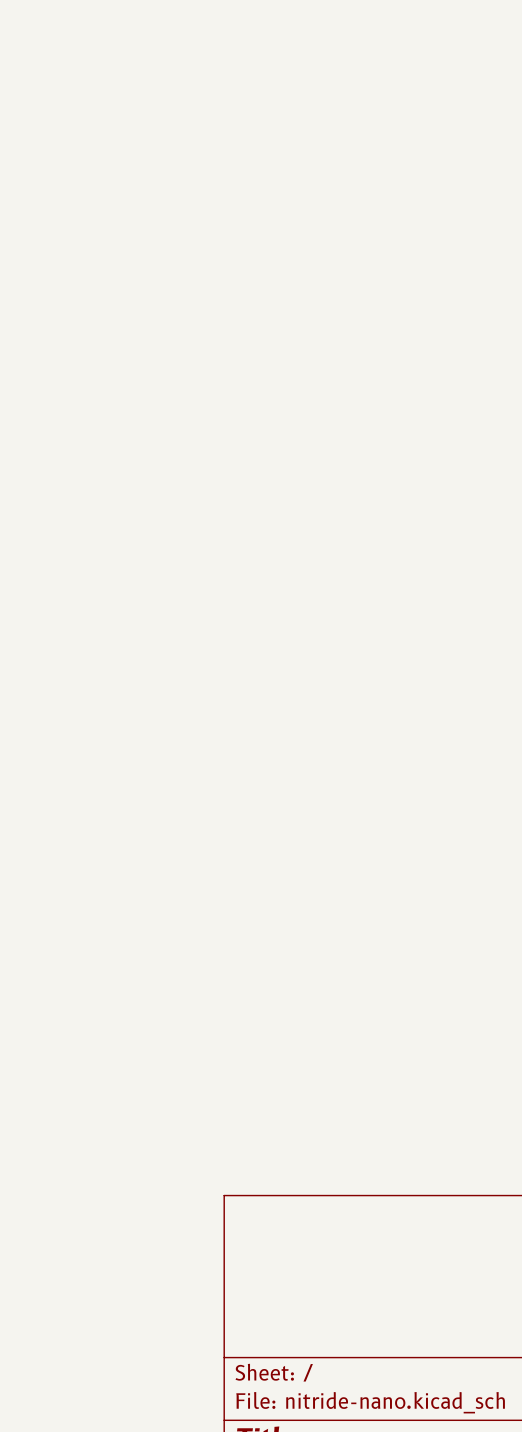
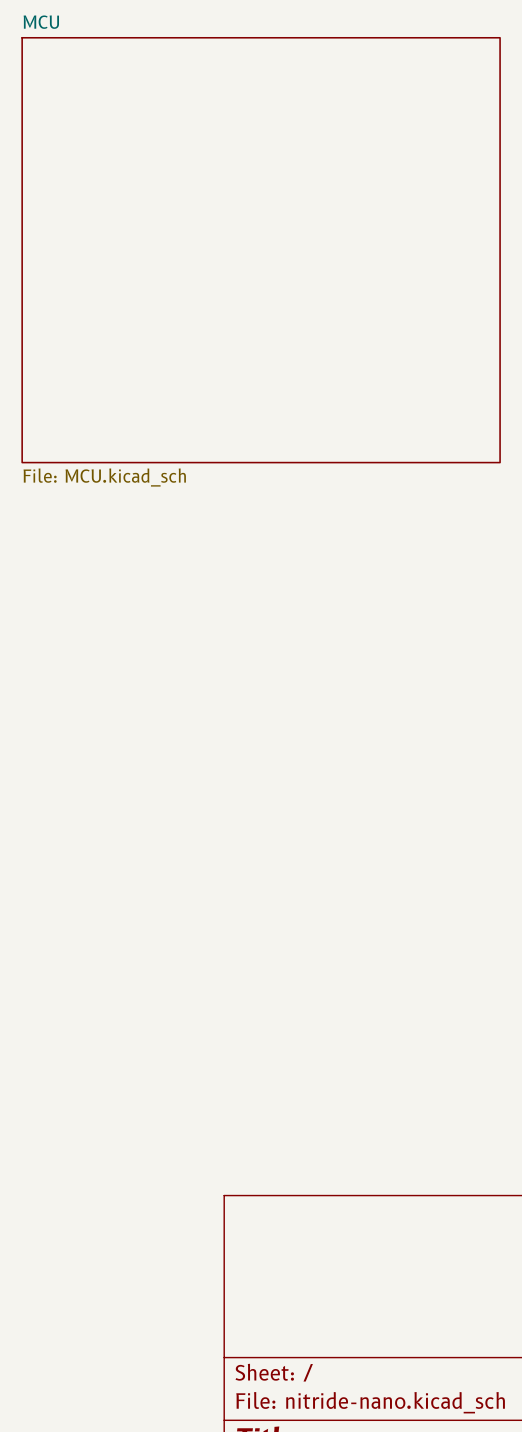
sheet MCU: none -> File: MCU.kicad_sch (261, 250)

